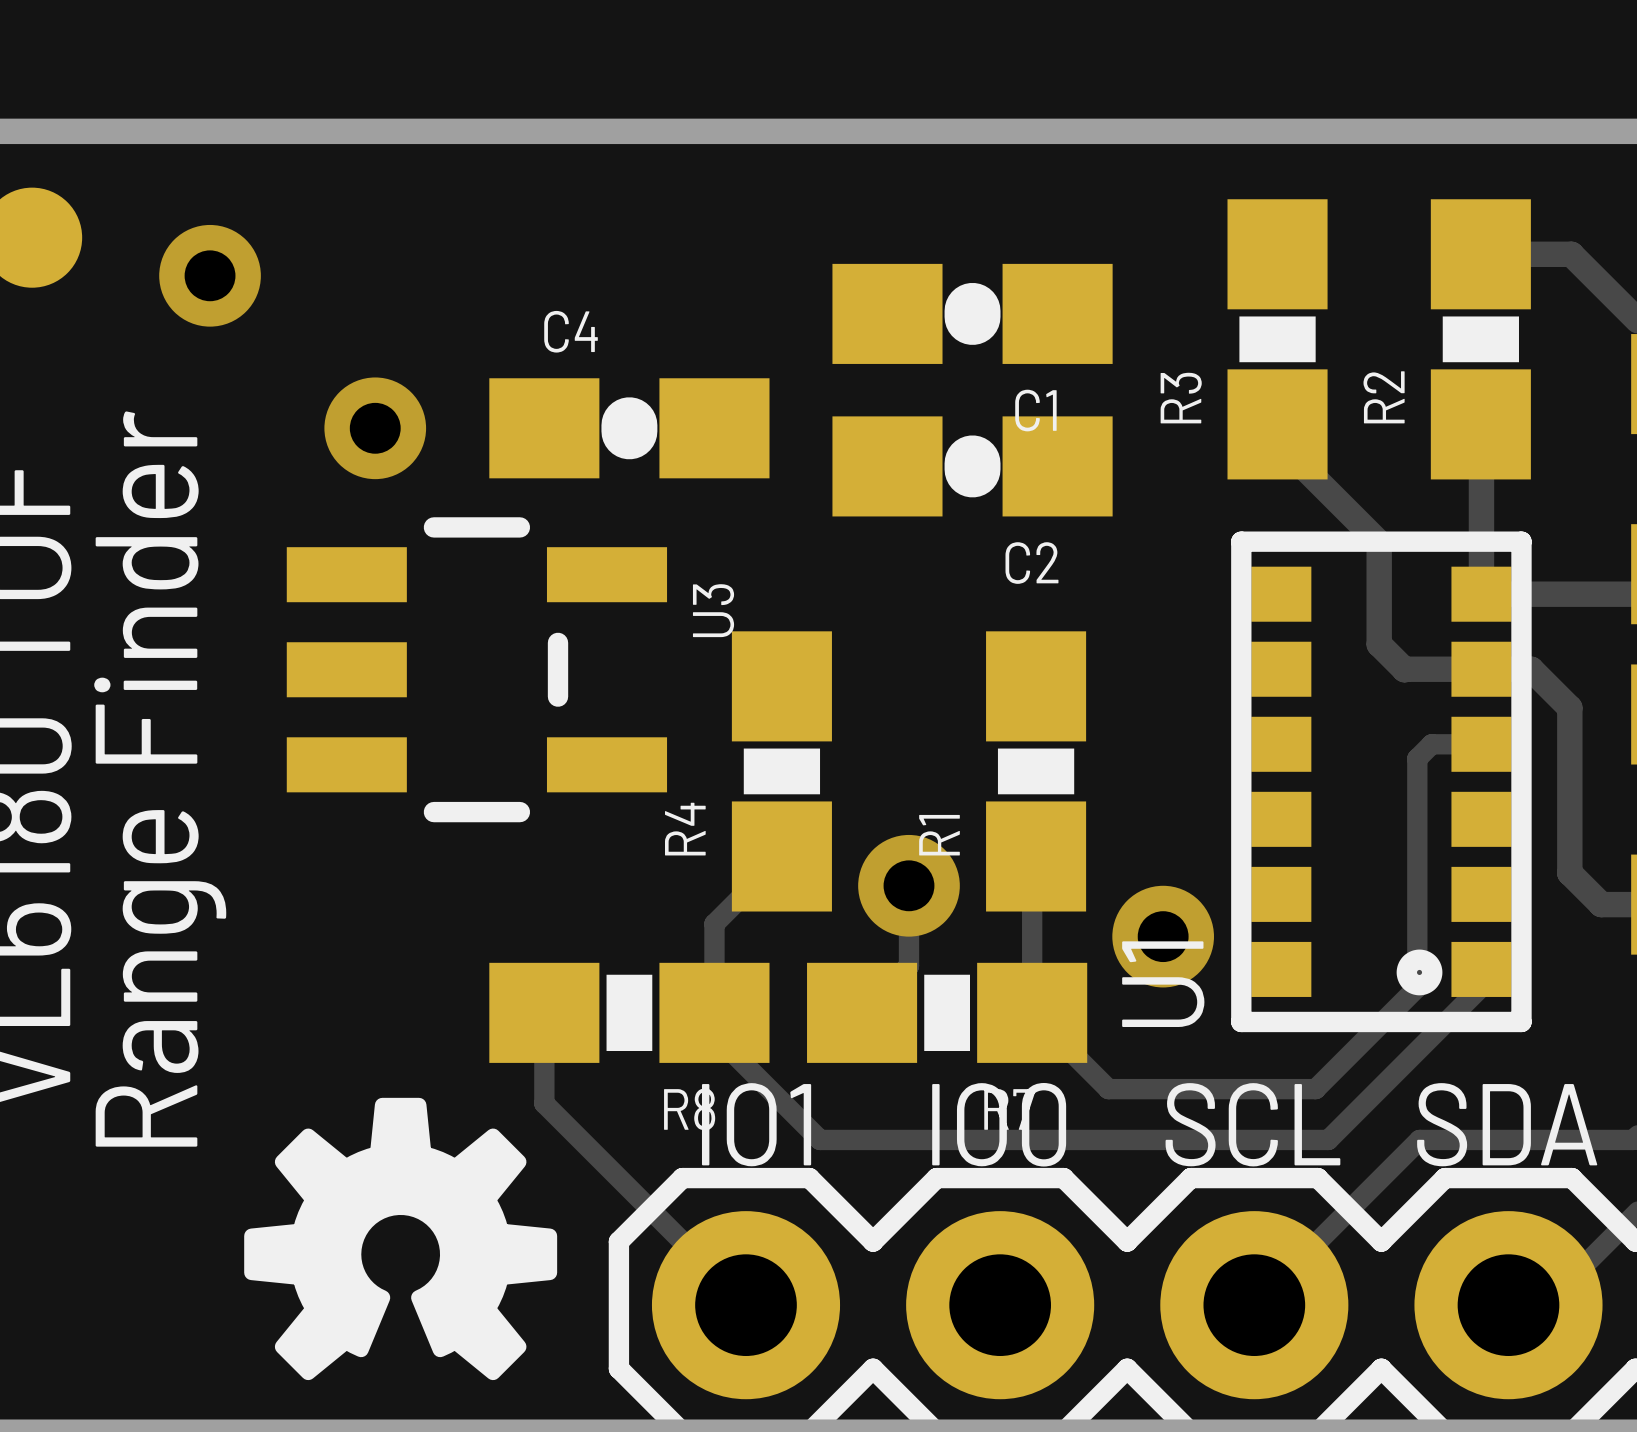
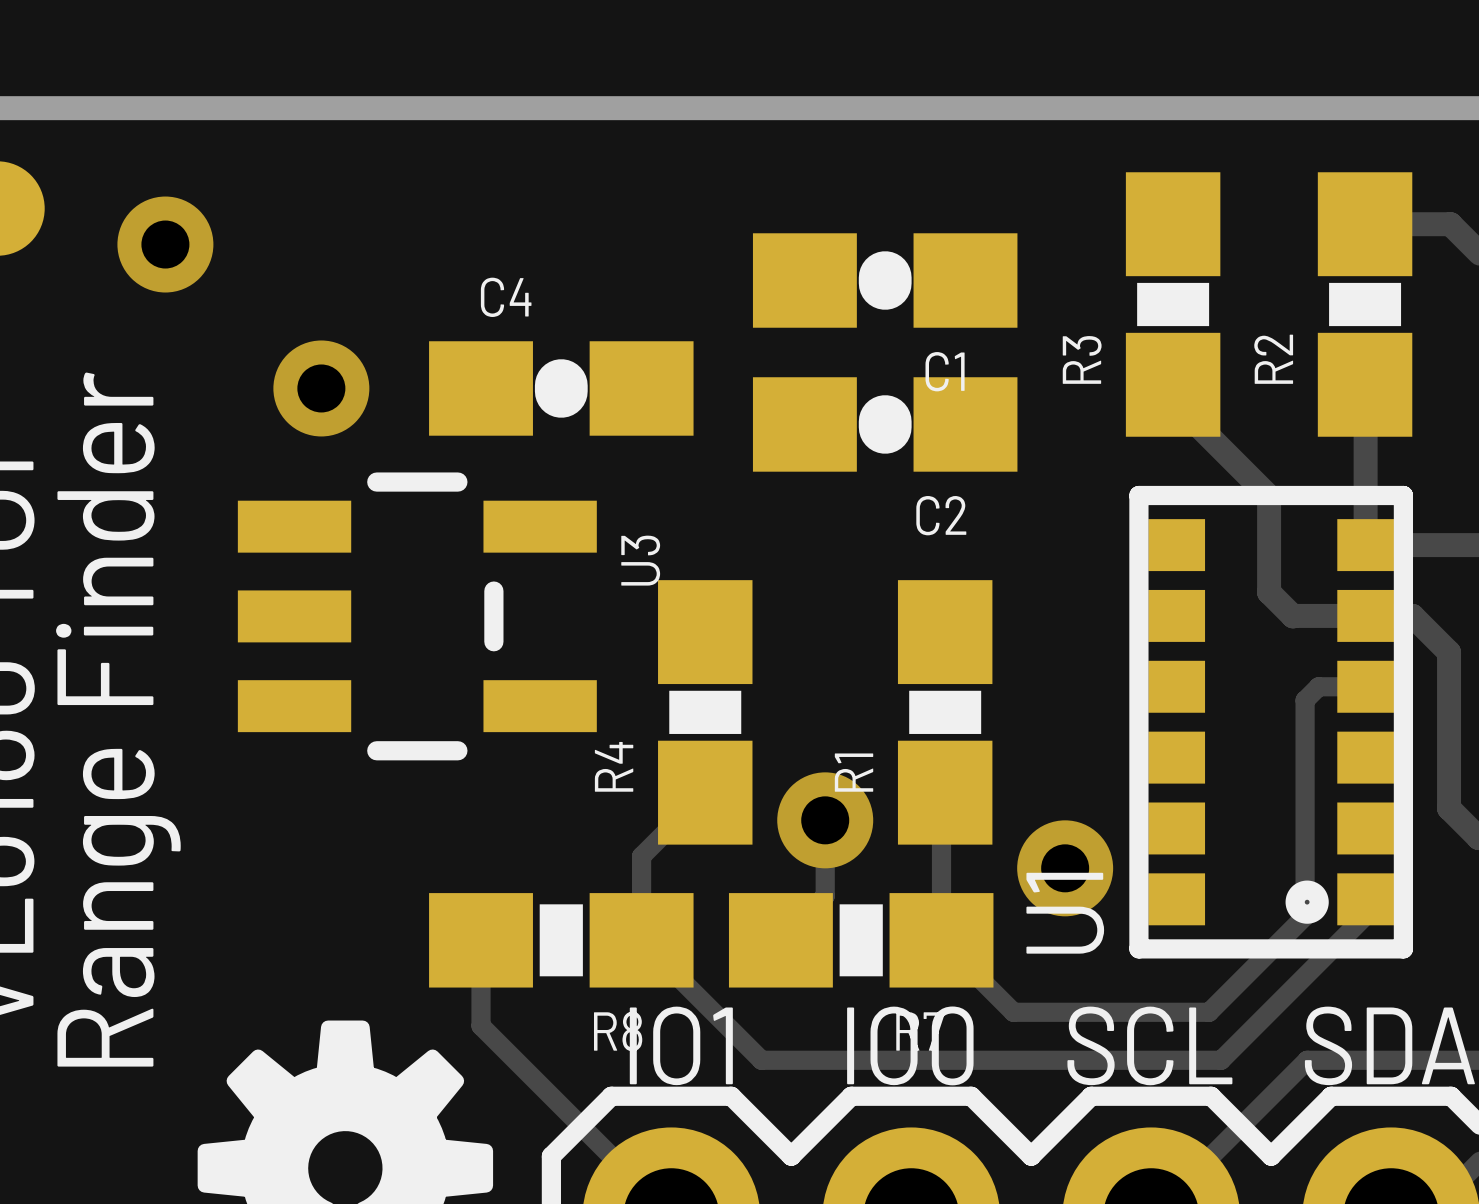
track: (714, 1012) (714, 1034) (820, 1139) (841, 1139) -> (641, 940) (761, 1060)

